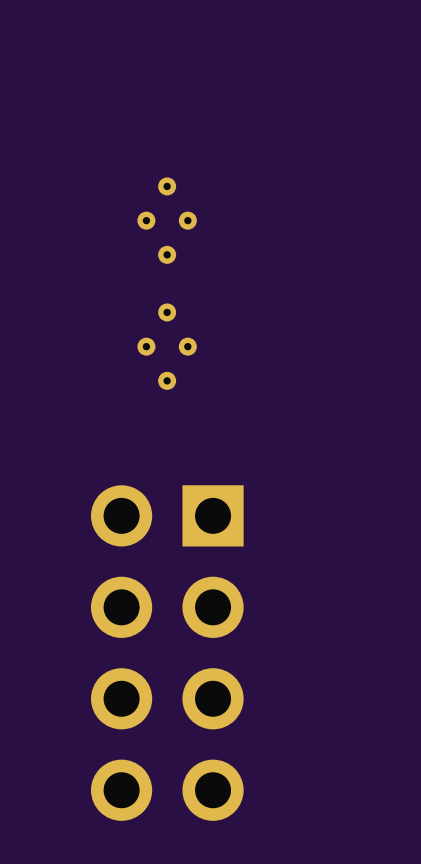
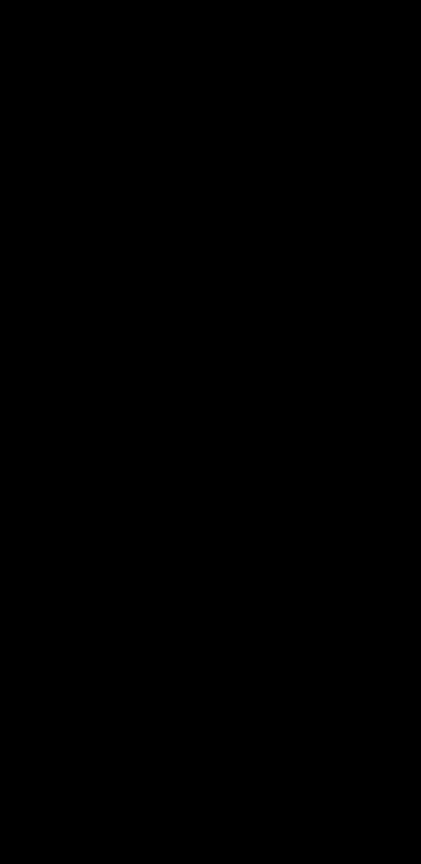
part: (167, 220) -> none
part: (167, 346) -> none
part: (167, 653) -> none

